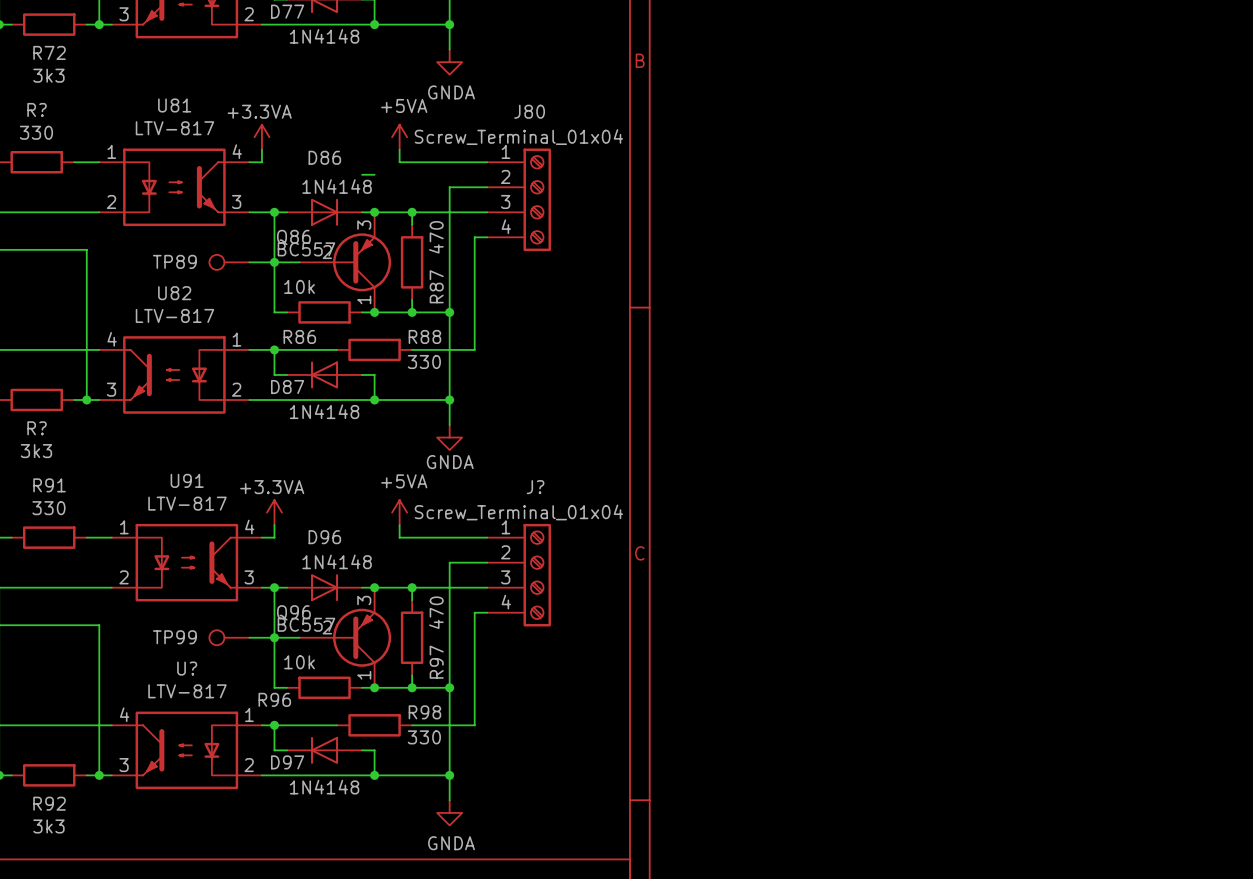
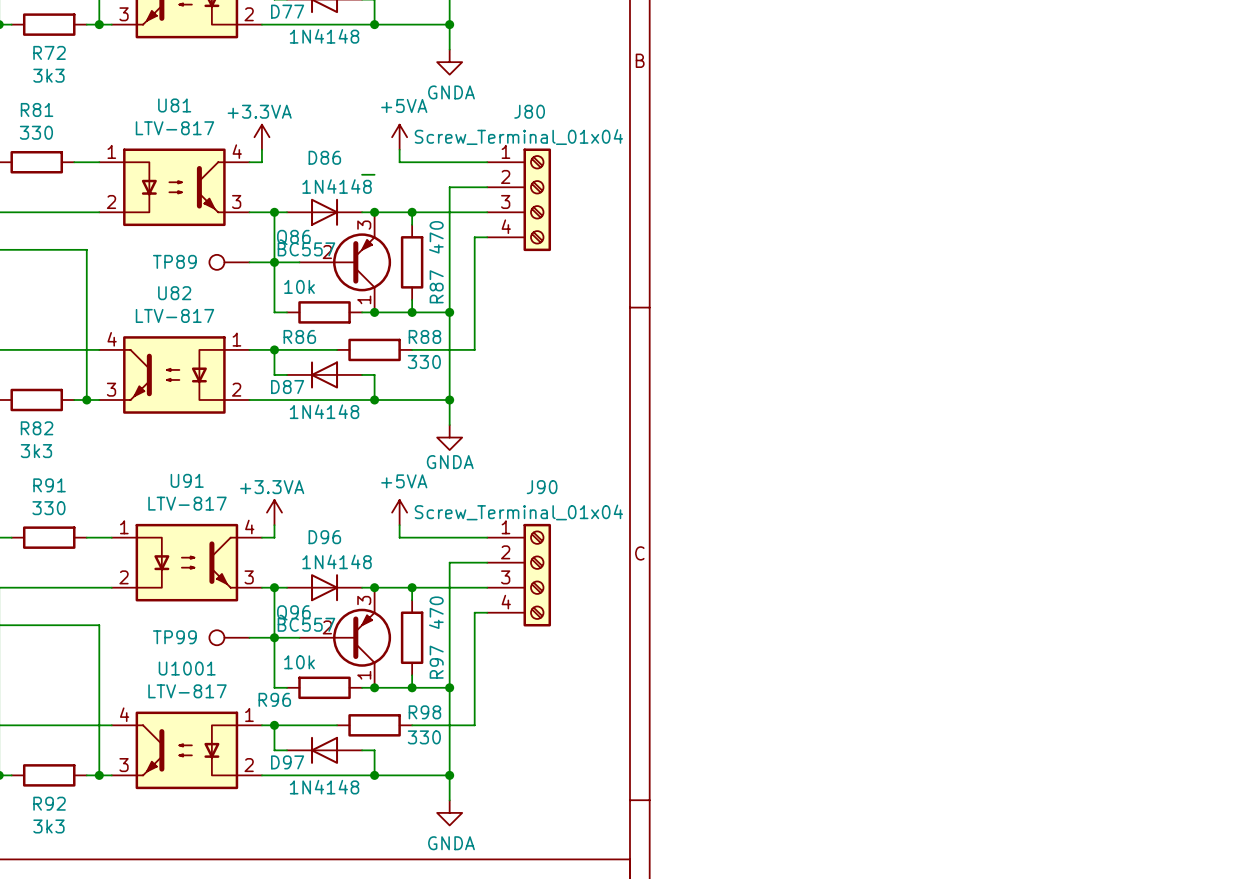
R? name: R? (37, 109) -> R81 (37, 109)
R? name: R? (37, 428) -> R82 (37, 428)
J? name: J? (535, 487) -> J90 (542, 487)
U? name: U? (187, 668) -> U1001 (187, 668)

